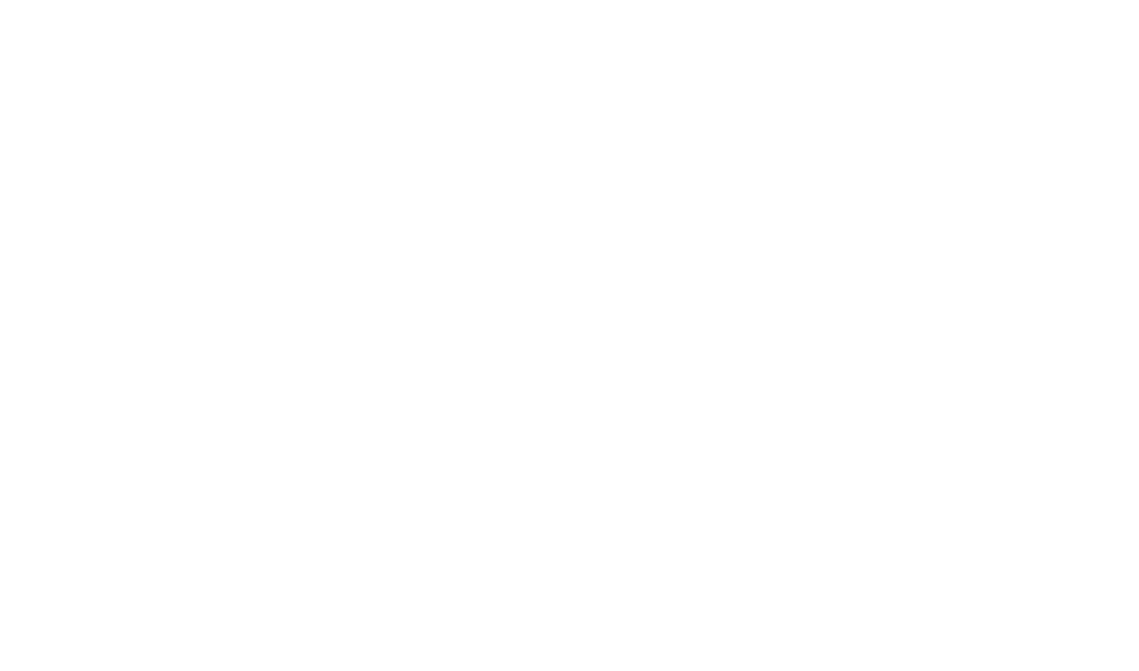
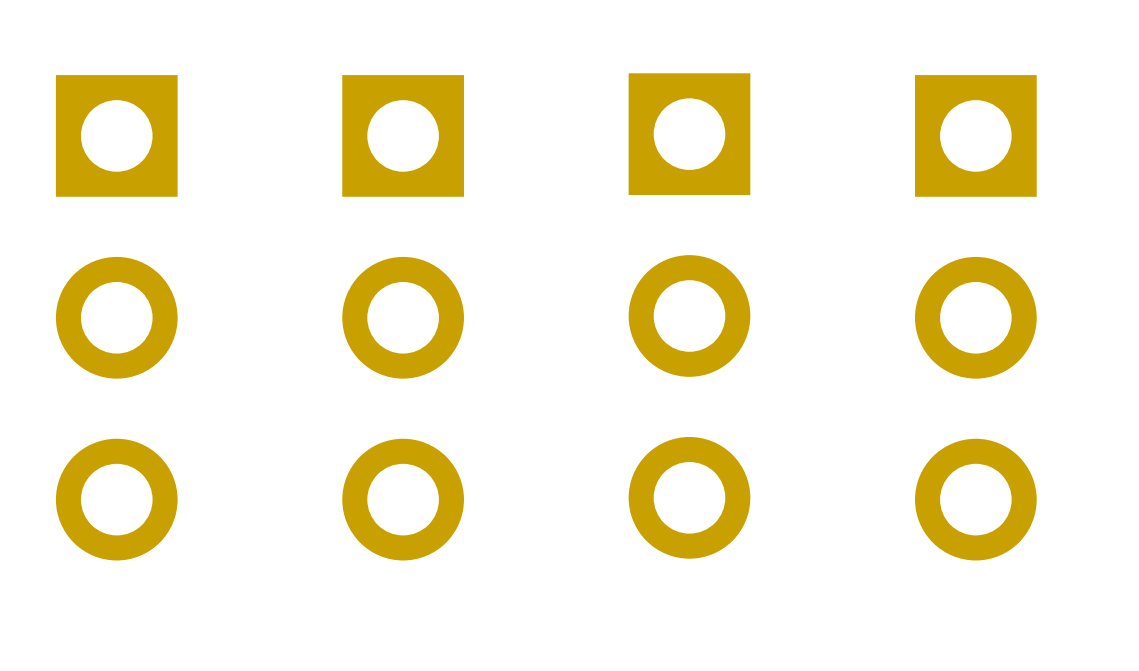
part: none -> (689, 315)
part: none -> (116, 317)
part: none -> (403, 317)
part: none -> (975, 317)

